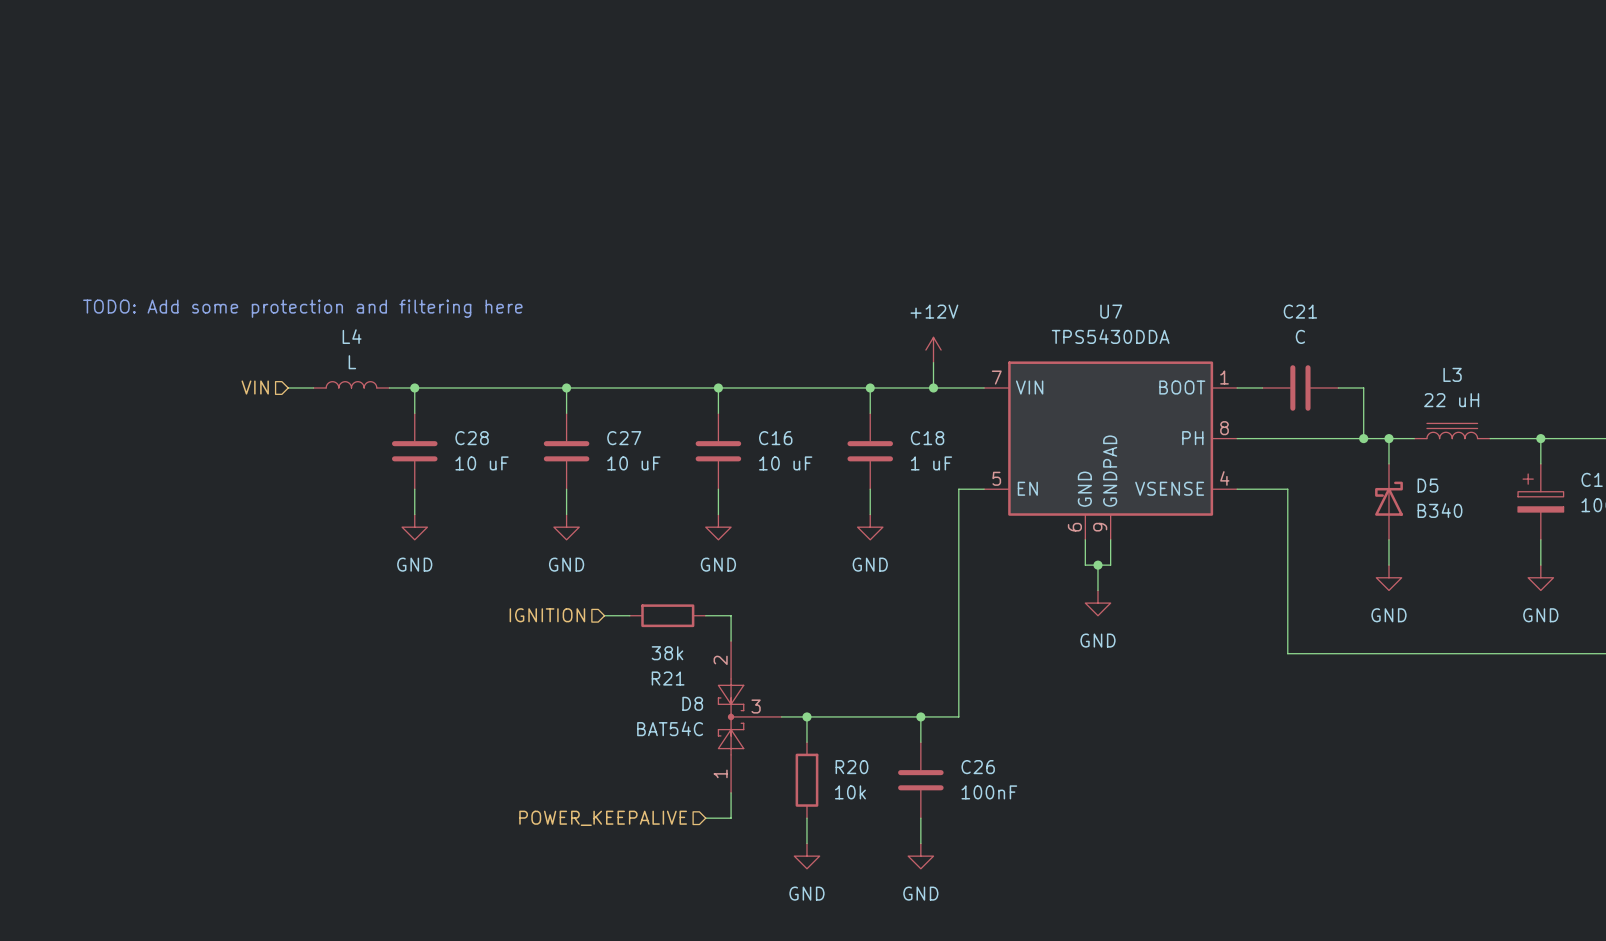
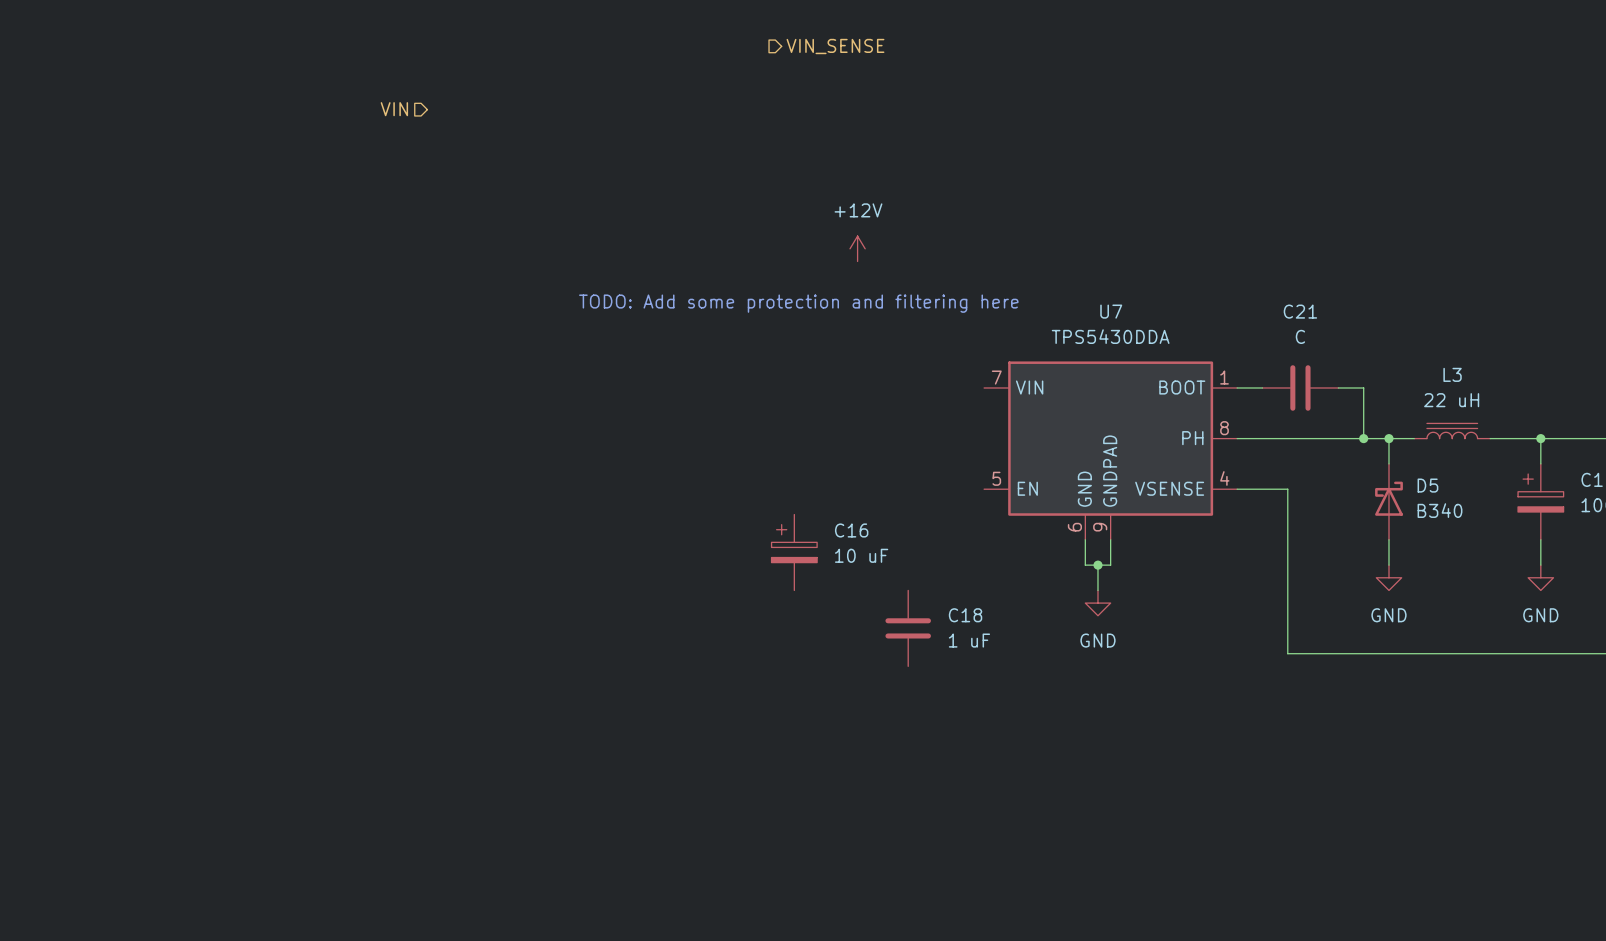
hierarchical label: none -> VIN_SENSE (835, 46)
hierarchical label: none -> VIN (394, 109)
text: none -> TODO: Add some protection and filtering here (798, 303)
text: TODO: Add some protection and filtering here (302, 308) -> none
power symbol position: +12V (933, 350) -> +12V (857, 248)
wire: (933, 362) (933, 387) -> none
L4: L (351, 384) -> none
hierarchical label: VIN (255, 387) -> none
wire: (288, 387) (313, 387) -> none
wire: (389, 387) (984, 387) -> none
wire: (414, 387) (414, 413) -> none
junction: (414, 387) -> none
wire: (566, 387) (566, 413) -> none
junction: (566, 387) -> none
wire: (718, 387) (718, 413) -> none
junction: (718, 387) -> none
wire: (870, 387) (870, 413) -> none
junction: (870, 387) -> none
junction: (933, 387) -> none
C16 symbol: [695, 413, 742, 490] -> [771, 514, 818, 591]
C28: 10 uF (414, 451) -> none
C27: 10 uF (566, 451) -> none
C18 position: (870, 451) -> (908, 628)
wire: (414, 489) (414, 514) -> none
wire: (566, 489) (566, 514) -> none
wire: (718, 489) (718, 514) -> none
wire: (870, 489) (870, 514) -> none
wire: (984, 489) (958, 489) (958, 716) (781, 716) -> none
power symbol: GND (414, 527) -> none
power symbol: GND (566, 527) -> none
power symbol: GND (718, 527) -> none
power symbol: GND (870, 527) -> none
hierarchical label: IGNITION (547, 615) -> none
wire: (604, 615) (629, 615) -> none
R21: 38k (667, 615) -> none
wire: (705, 615) (731, 615) (731, 641) -> none
D8: BAT54C (750, 716) -> none
wire: (806, 716) (806, 742) -> none
junction: (806, 716) -> none
wire: (920, 716) (920, 742) -> none
junction: (920, 716) -> none
R20: 10k (806, 780) -> none
C26: 100nF (920, 780) -> none
wire: (731, 792) (731, 818) (705, 818) -> none
hierarchical label: POWER_KEEPALIVE (603, 818) -> none
wire: (806, 818) (806, 843) -> none
wire: (920, 818) (920, 843) -> none
power symbol: GND (806, 856) -> none
power symbol: GND (920, 856) -> none

